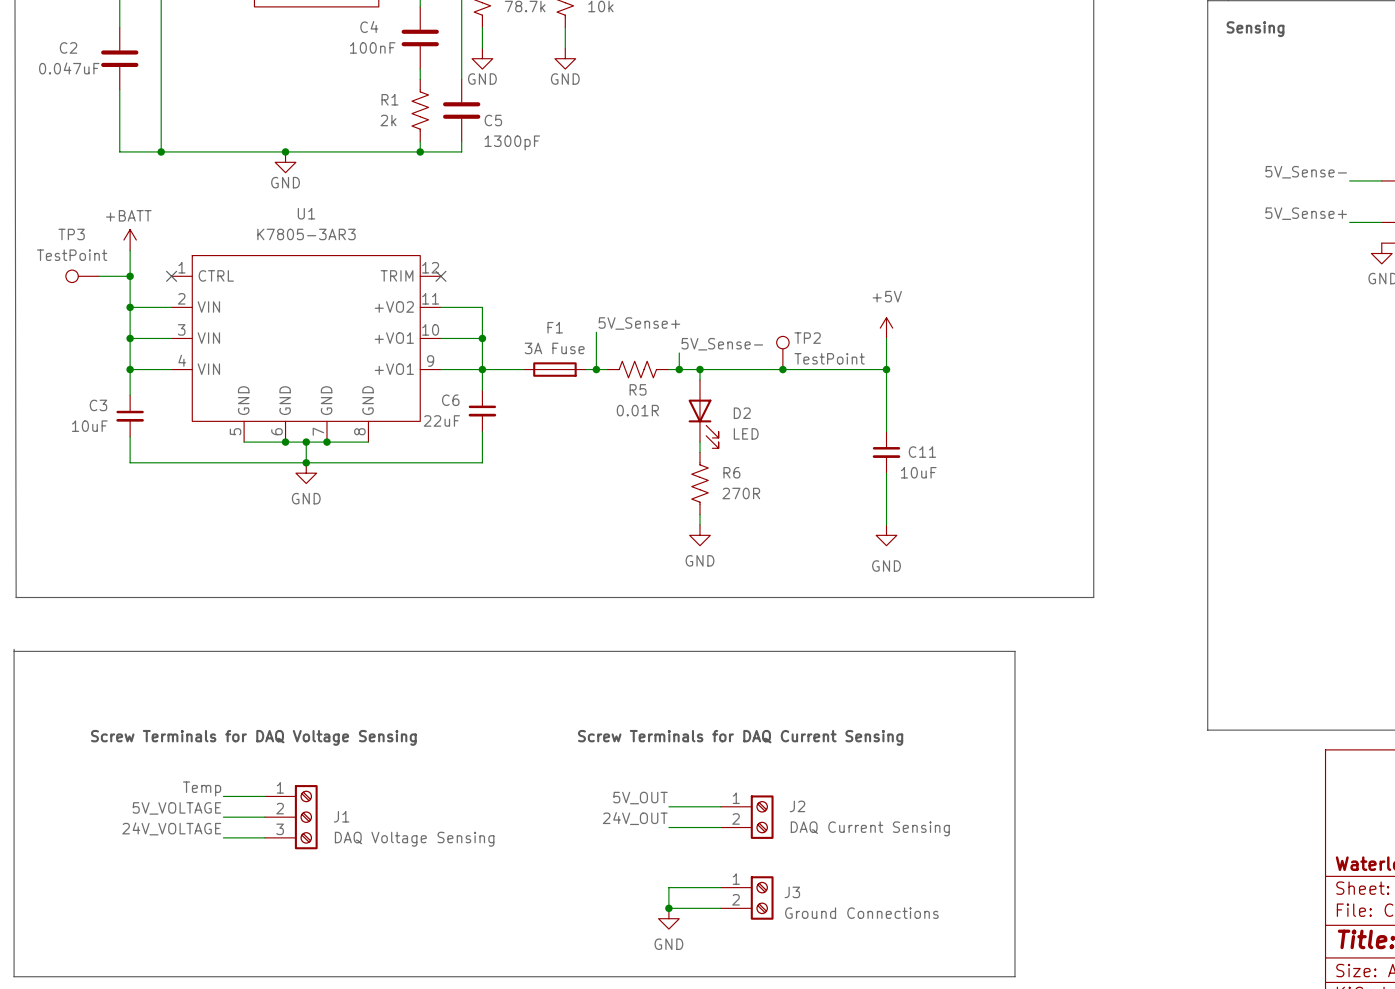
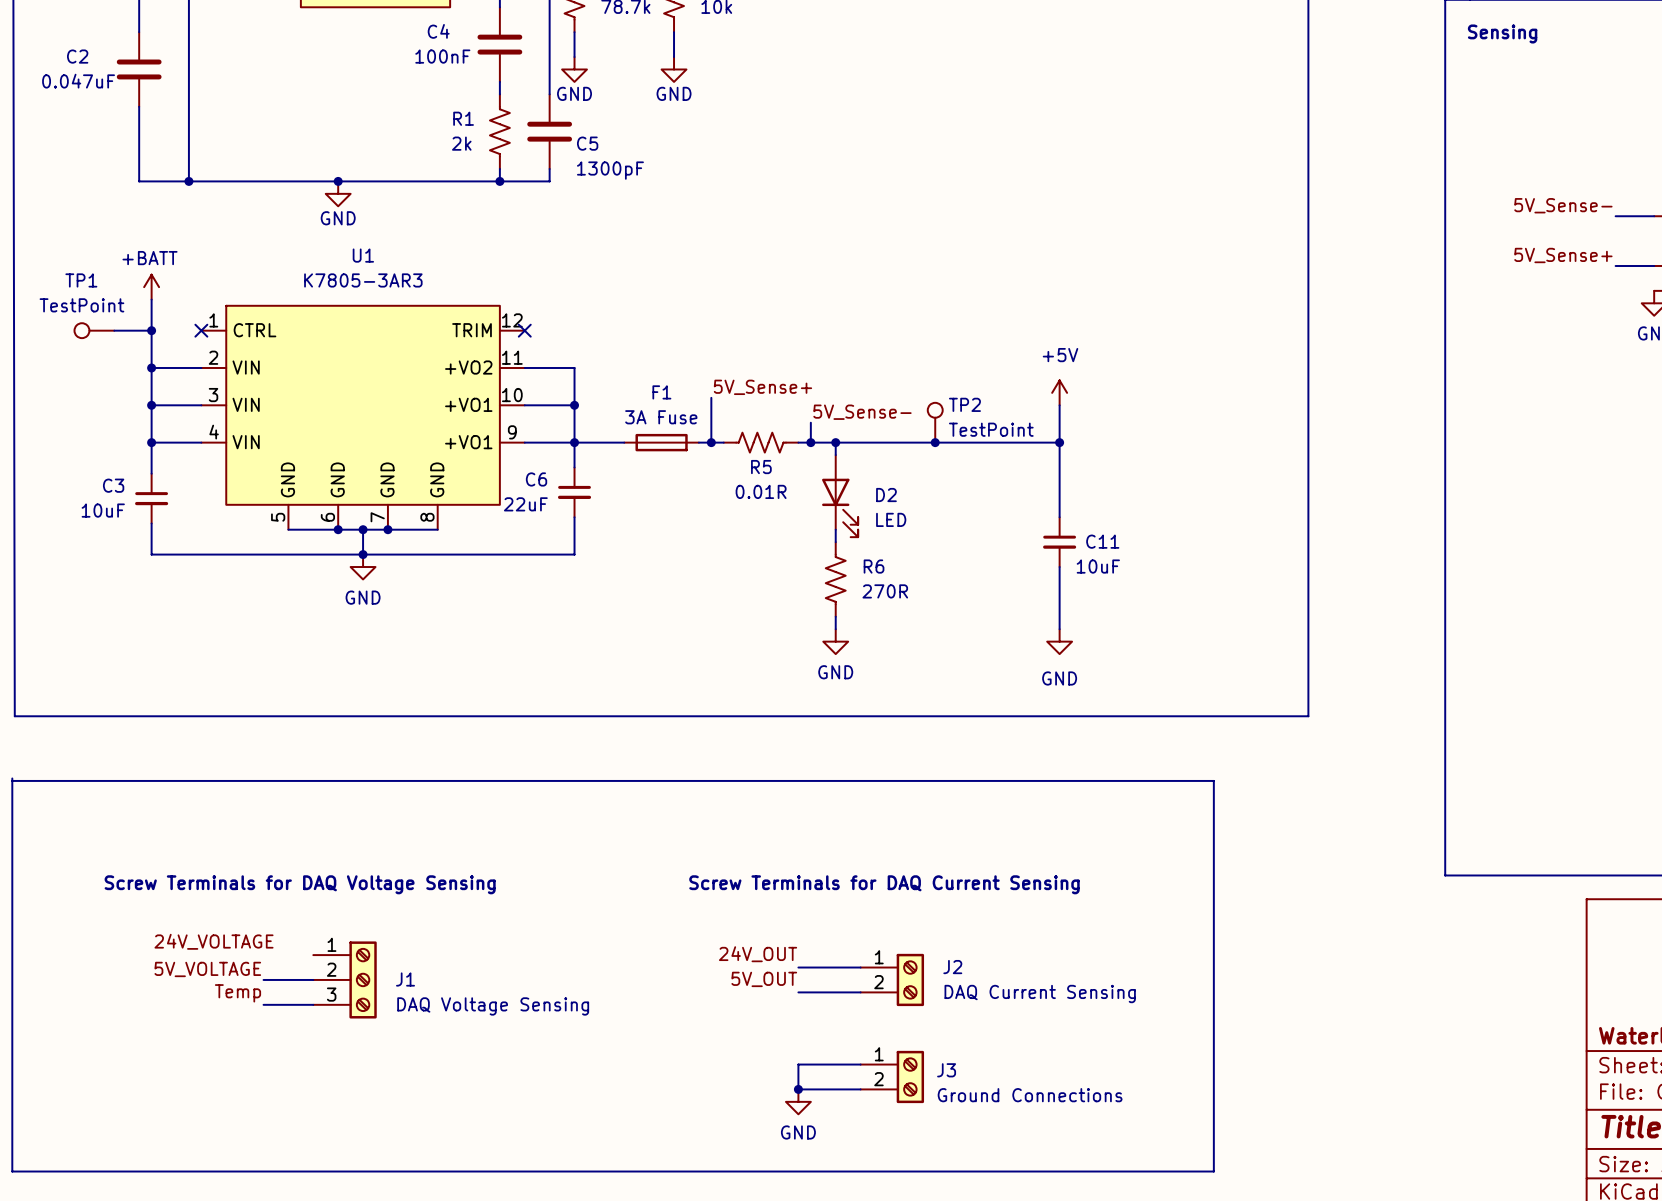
TP3 name: TP3 (71, 234) -> TP1 (81, 280)
label: none -> 24V_VOLTAGE (214, 941)
label: Temp (202, 788) -> none
wire: (223, 796) (264, 796) -> none
label: 5V_OUT (640, 798) -> 24V_OUT (758, 954)
label: 24V_OUT (635, 818) -> 5V_OUT (764, 979)
label: 24V_VOLTAGE (171, 828) -> Temp (237, 993)

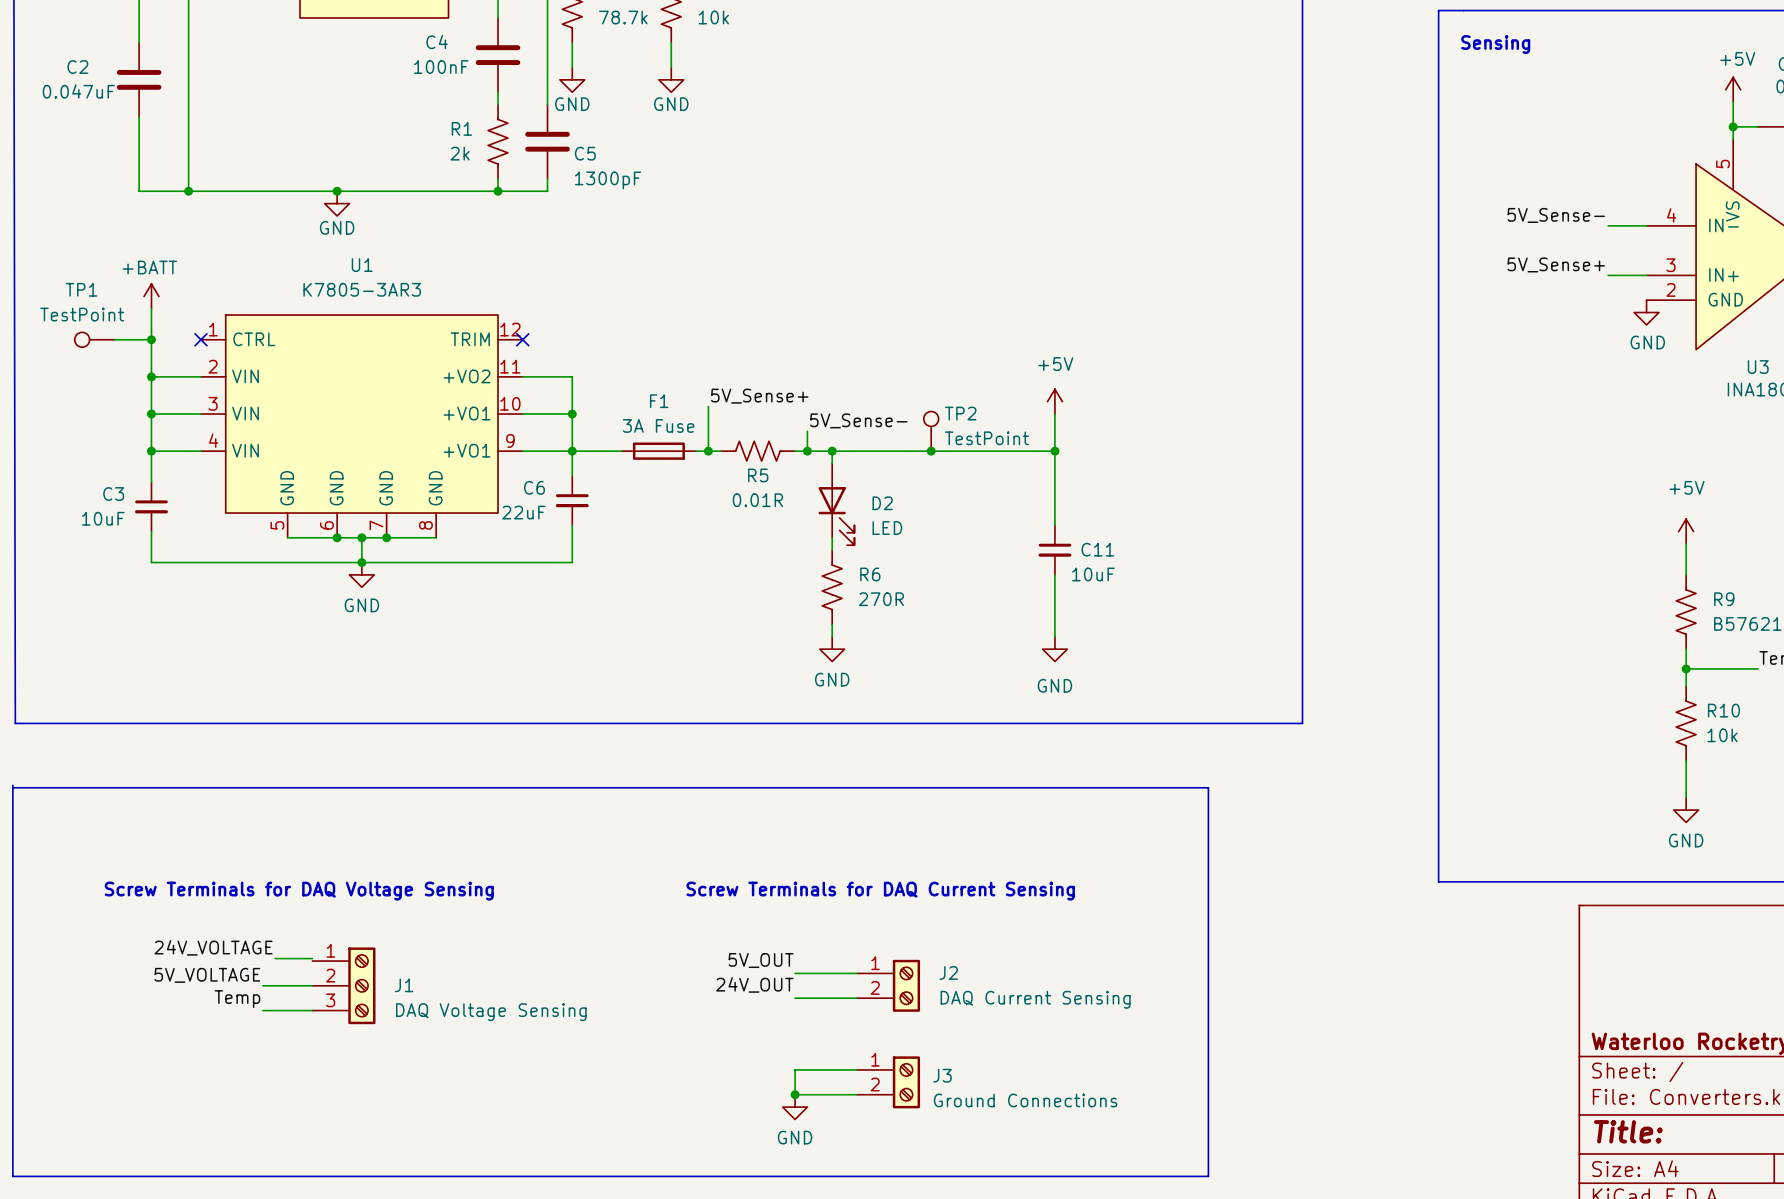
wire: none -> (275, 958) (312, 958)
label: 24V_OUT (758, 954) -> 5V_OUT (761, 960)
label: 5V_OUT (764, 979) -> 24V_OUT (754, 984)

